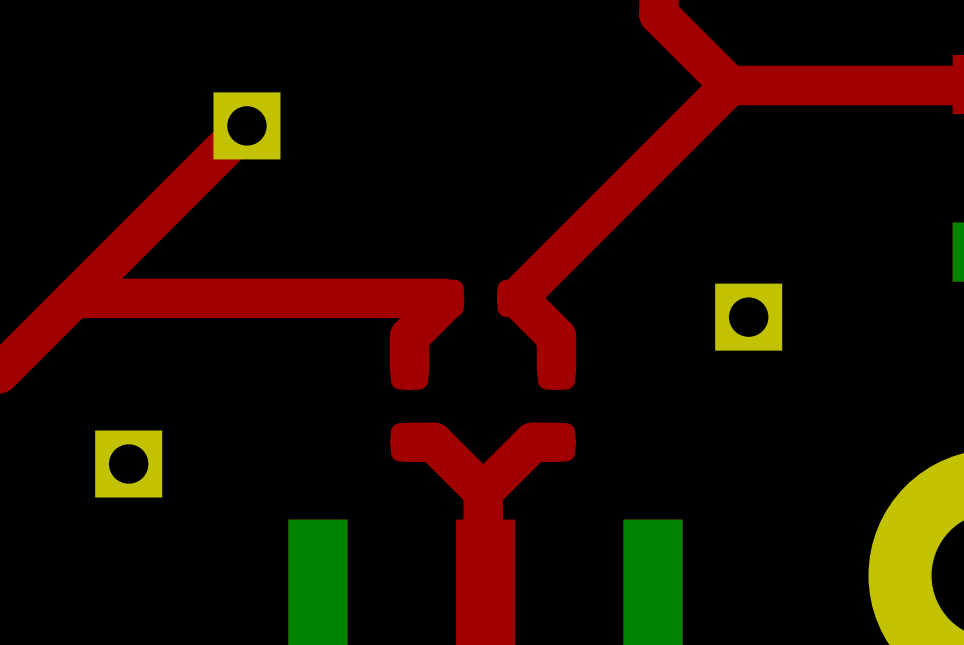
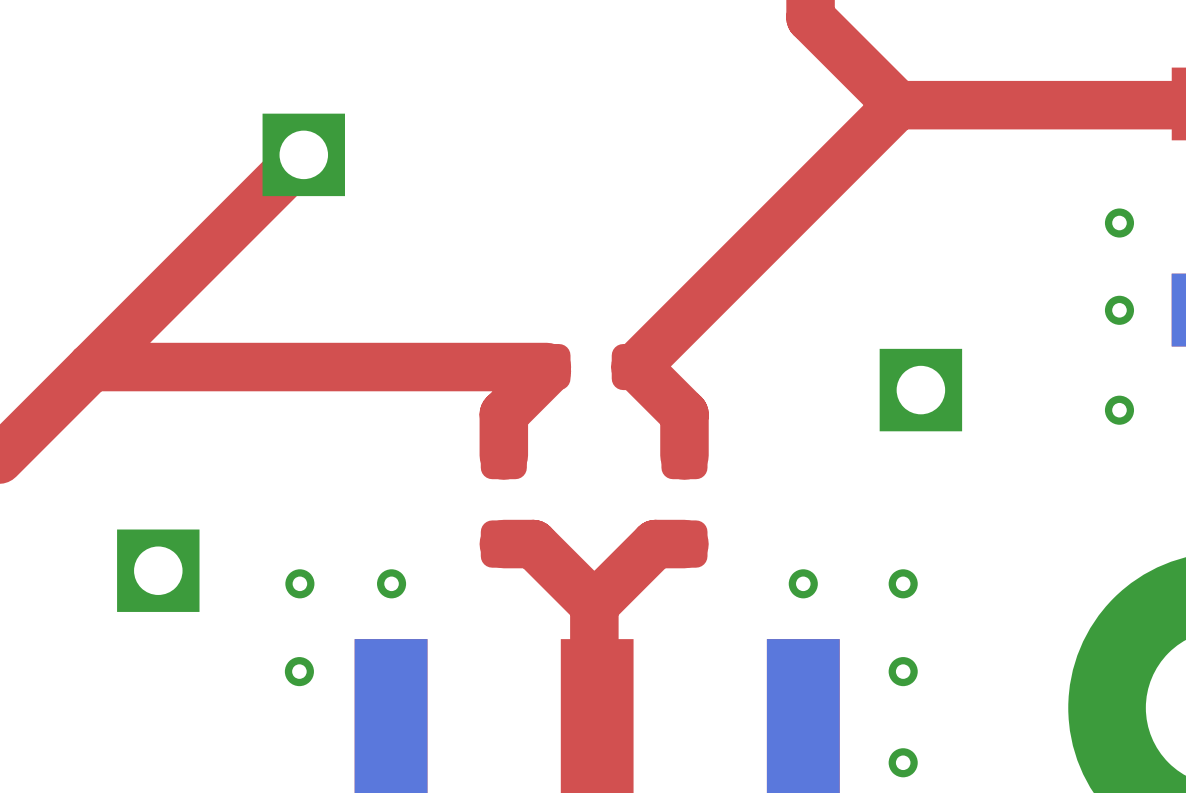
via: none -> (1119, 223)
via: none -> (1119, 310)
via: none -> (1119, 410)
via: none -> (299, 583)
via: none -> (391, 583)
via: none -> (803, 583)
via: none -> (903, 583)
via: none -> (299, 671)
via: none -> (903, 671)
via: none -> (903, 762)

